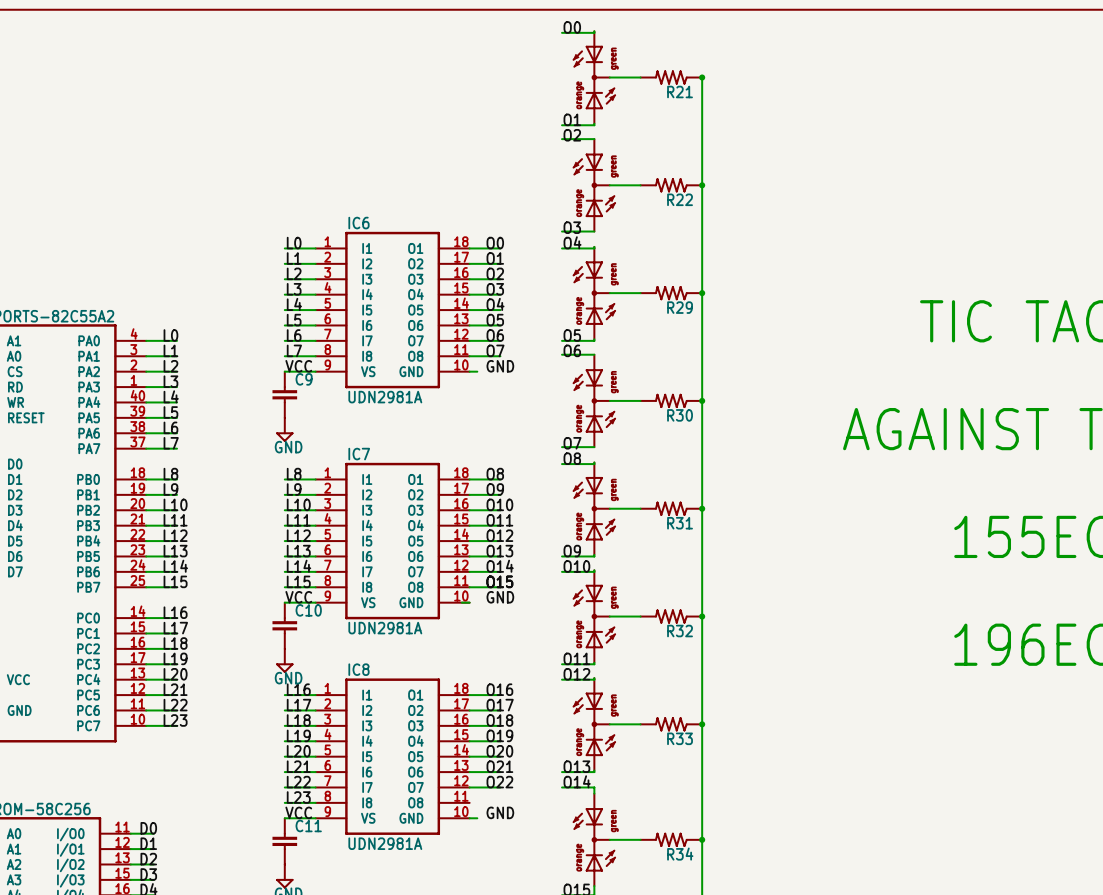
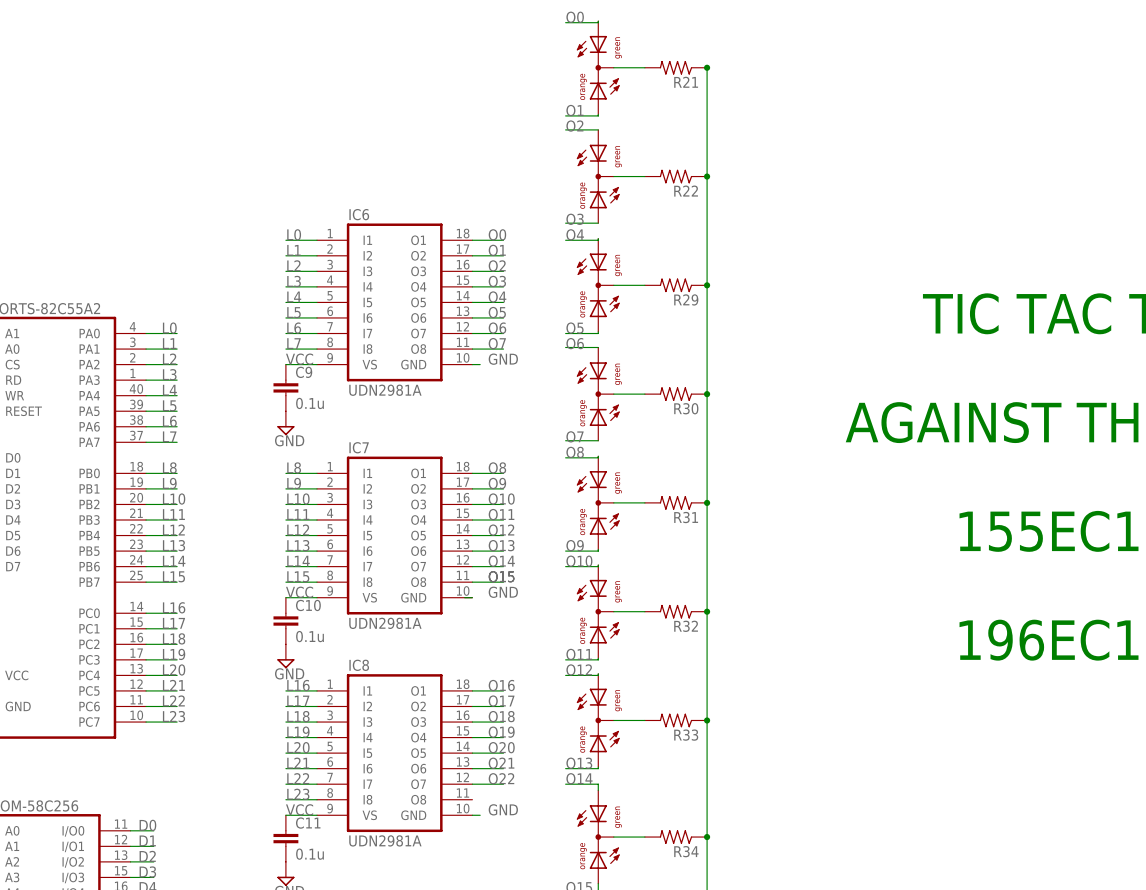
C9 value: none -> 0.1u (310, 403)
C10 value: none -> 0.1u (310, 636)
C11 value: none -> 0.1u (310, 854)

